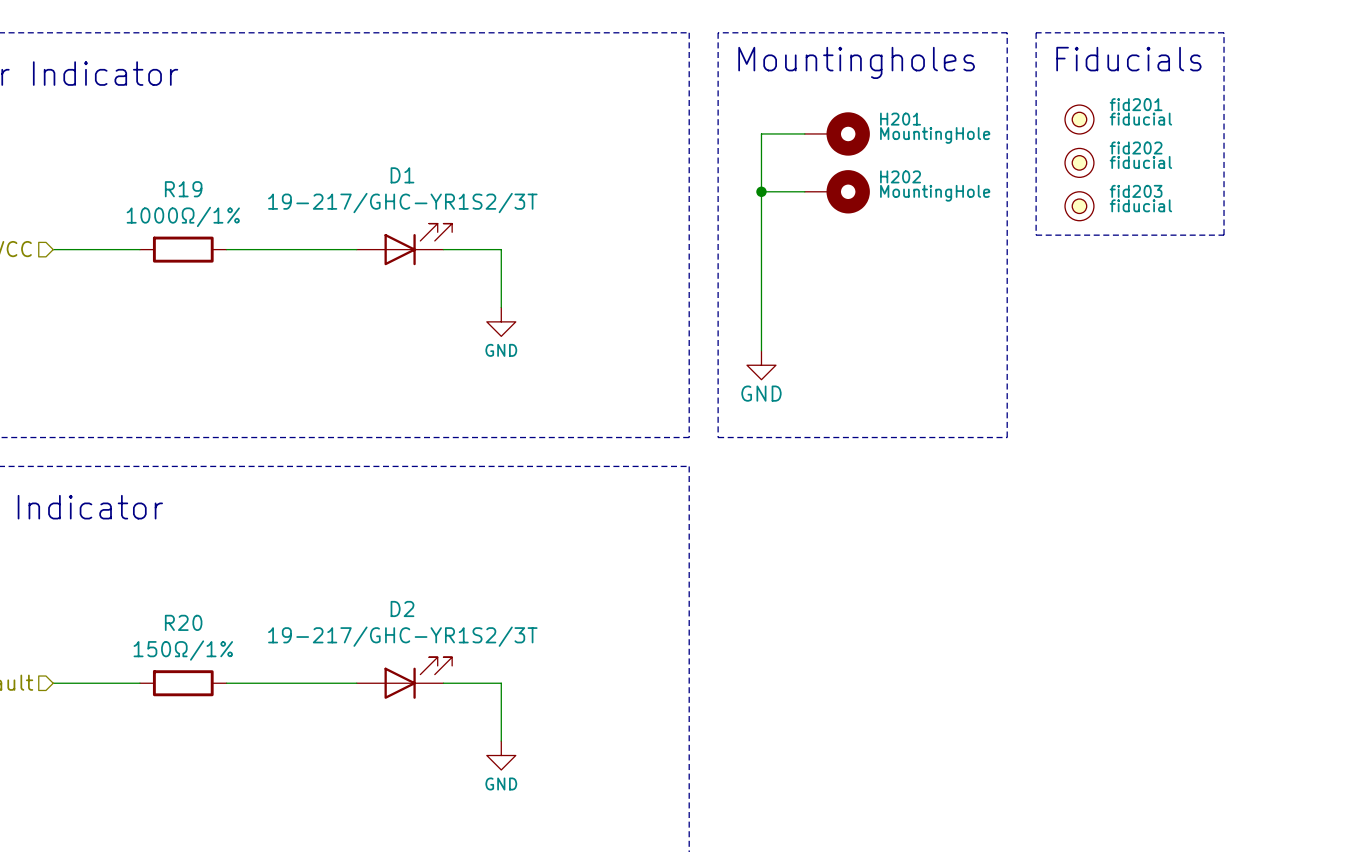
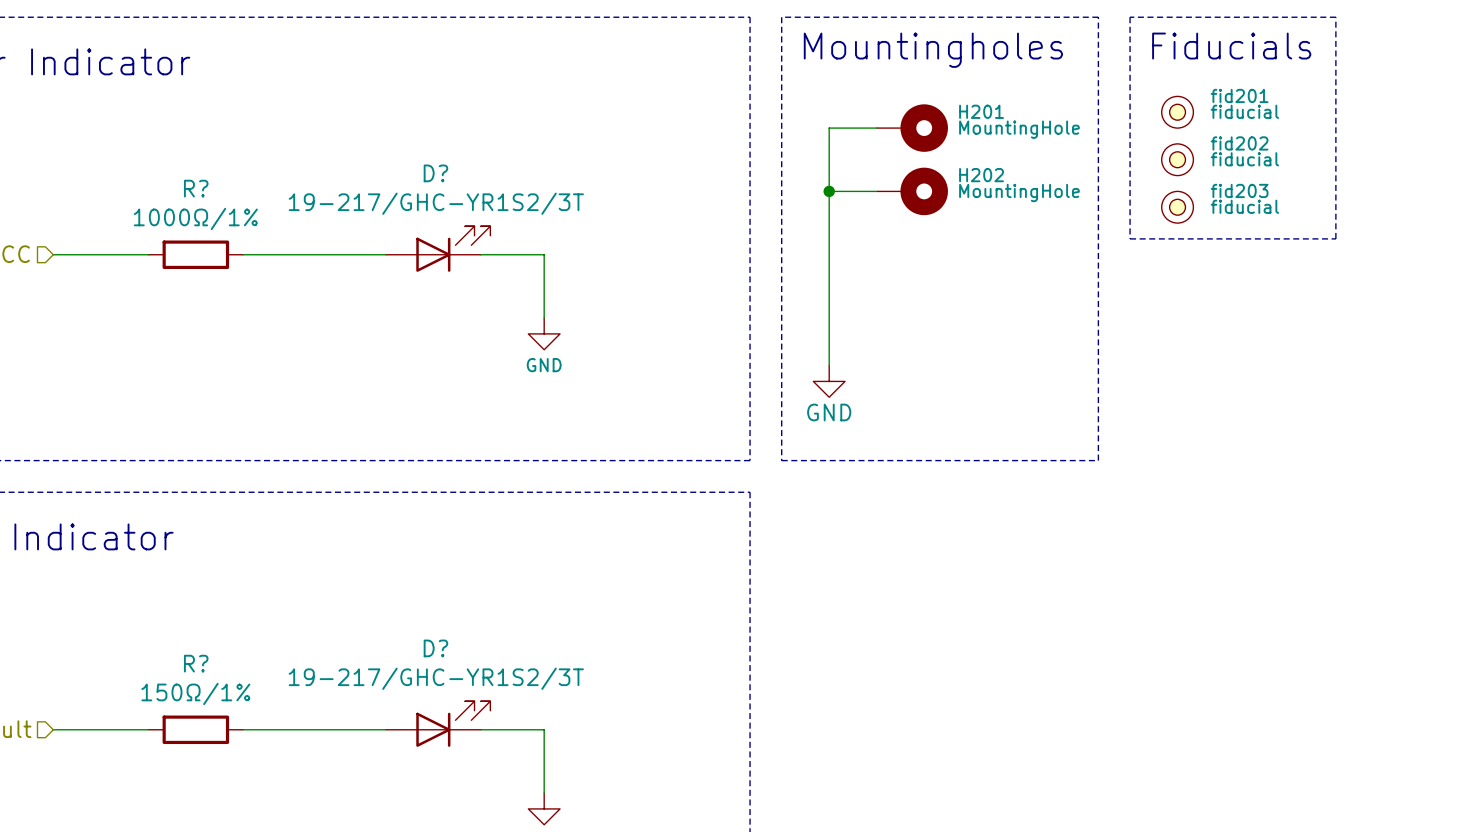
D1 name: D1 (402, 175) -> D? (435, 173)
R19 name: R19 (183, 189) -> R? (196, 188)
D2 name: D2 (402, 608) -> D? (435, 648)
R20 name: R20 (183, 622) -> R? (196, 663)

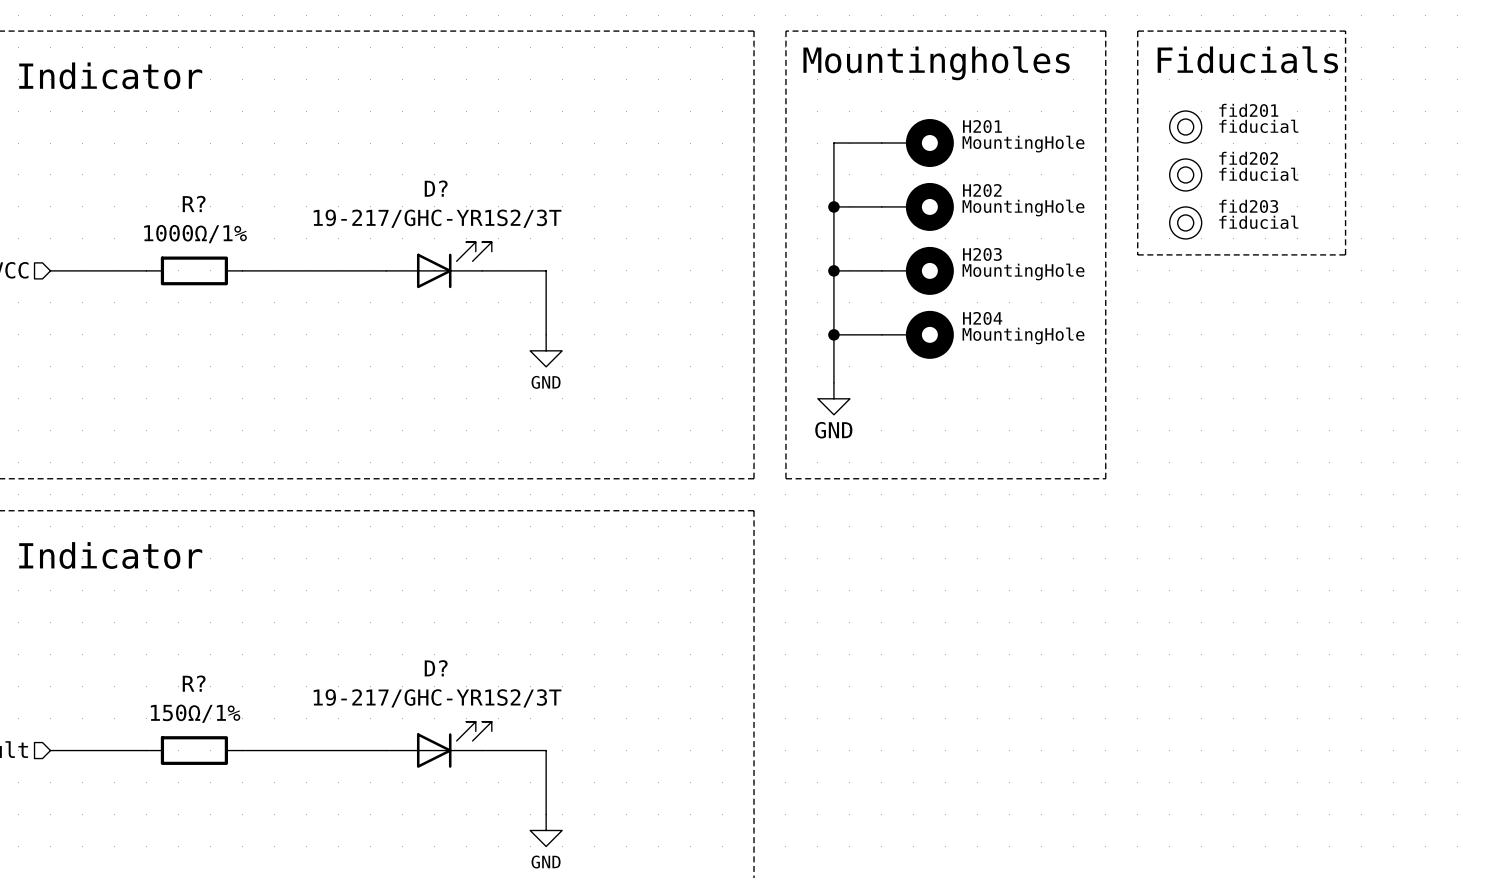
wire: none -> (833, 270) (881, 270)
junction: none -> (833, 270)
H203: none -> MountingHole (917, 270)
wire: none -> (833, 334) (881, 334)
junction: none -> (833, 334)
H204: none -> MountingHole (917, 334)

